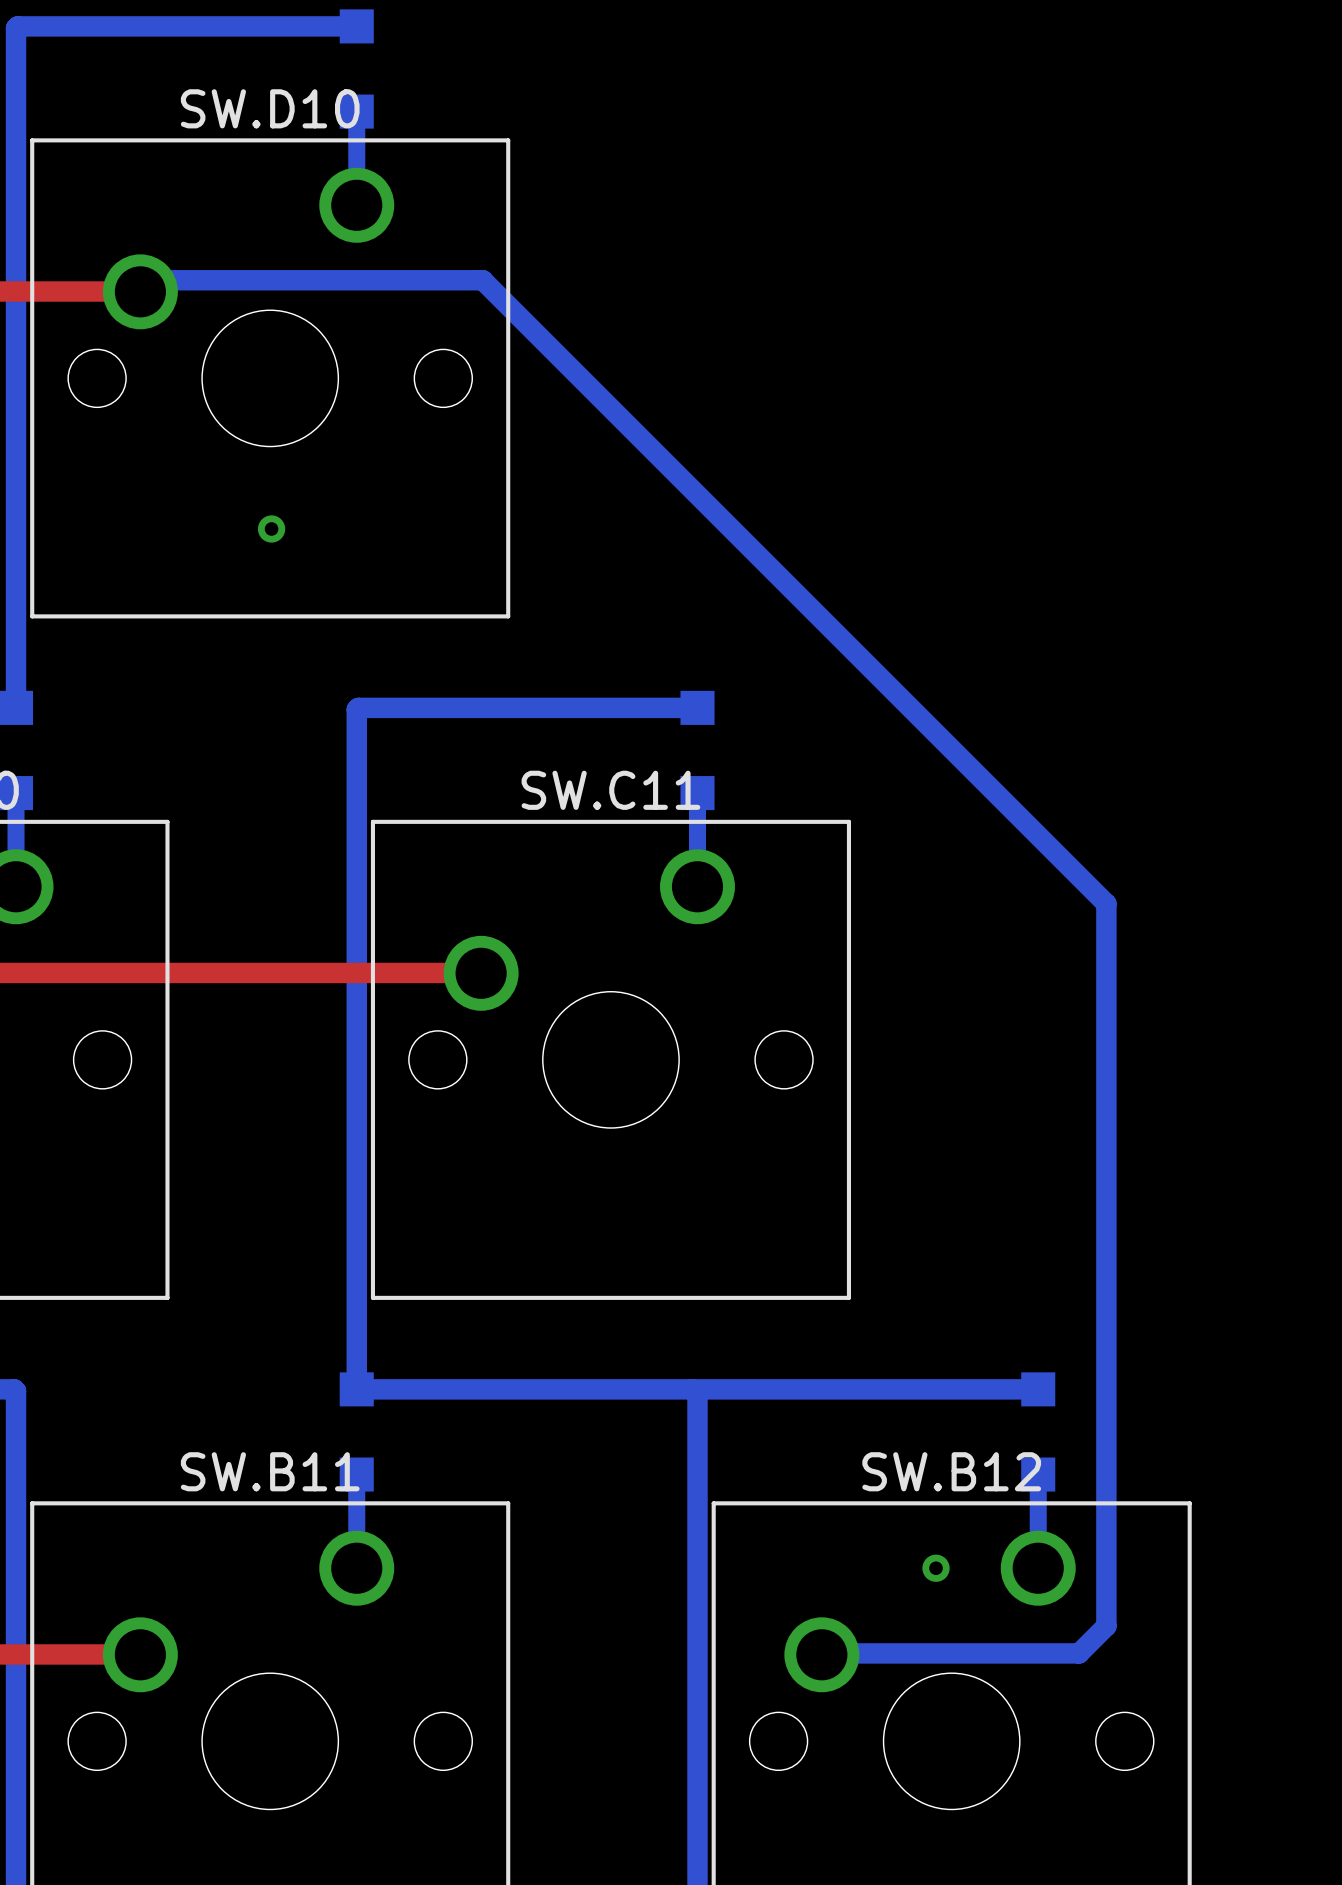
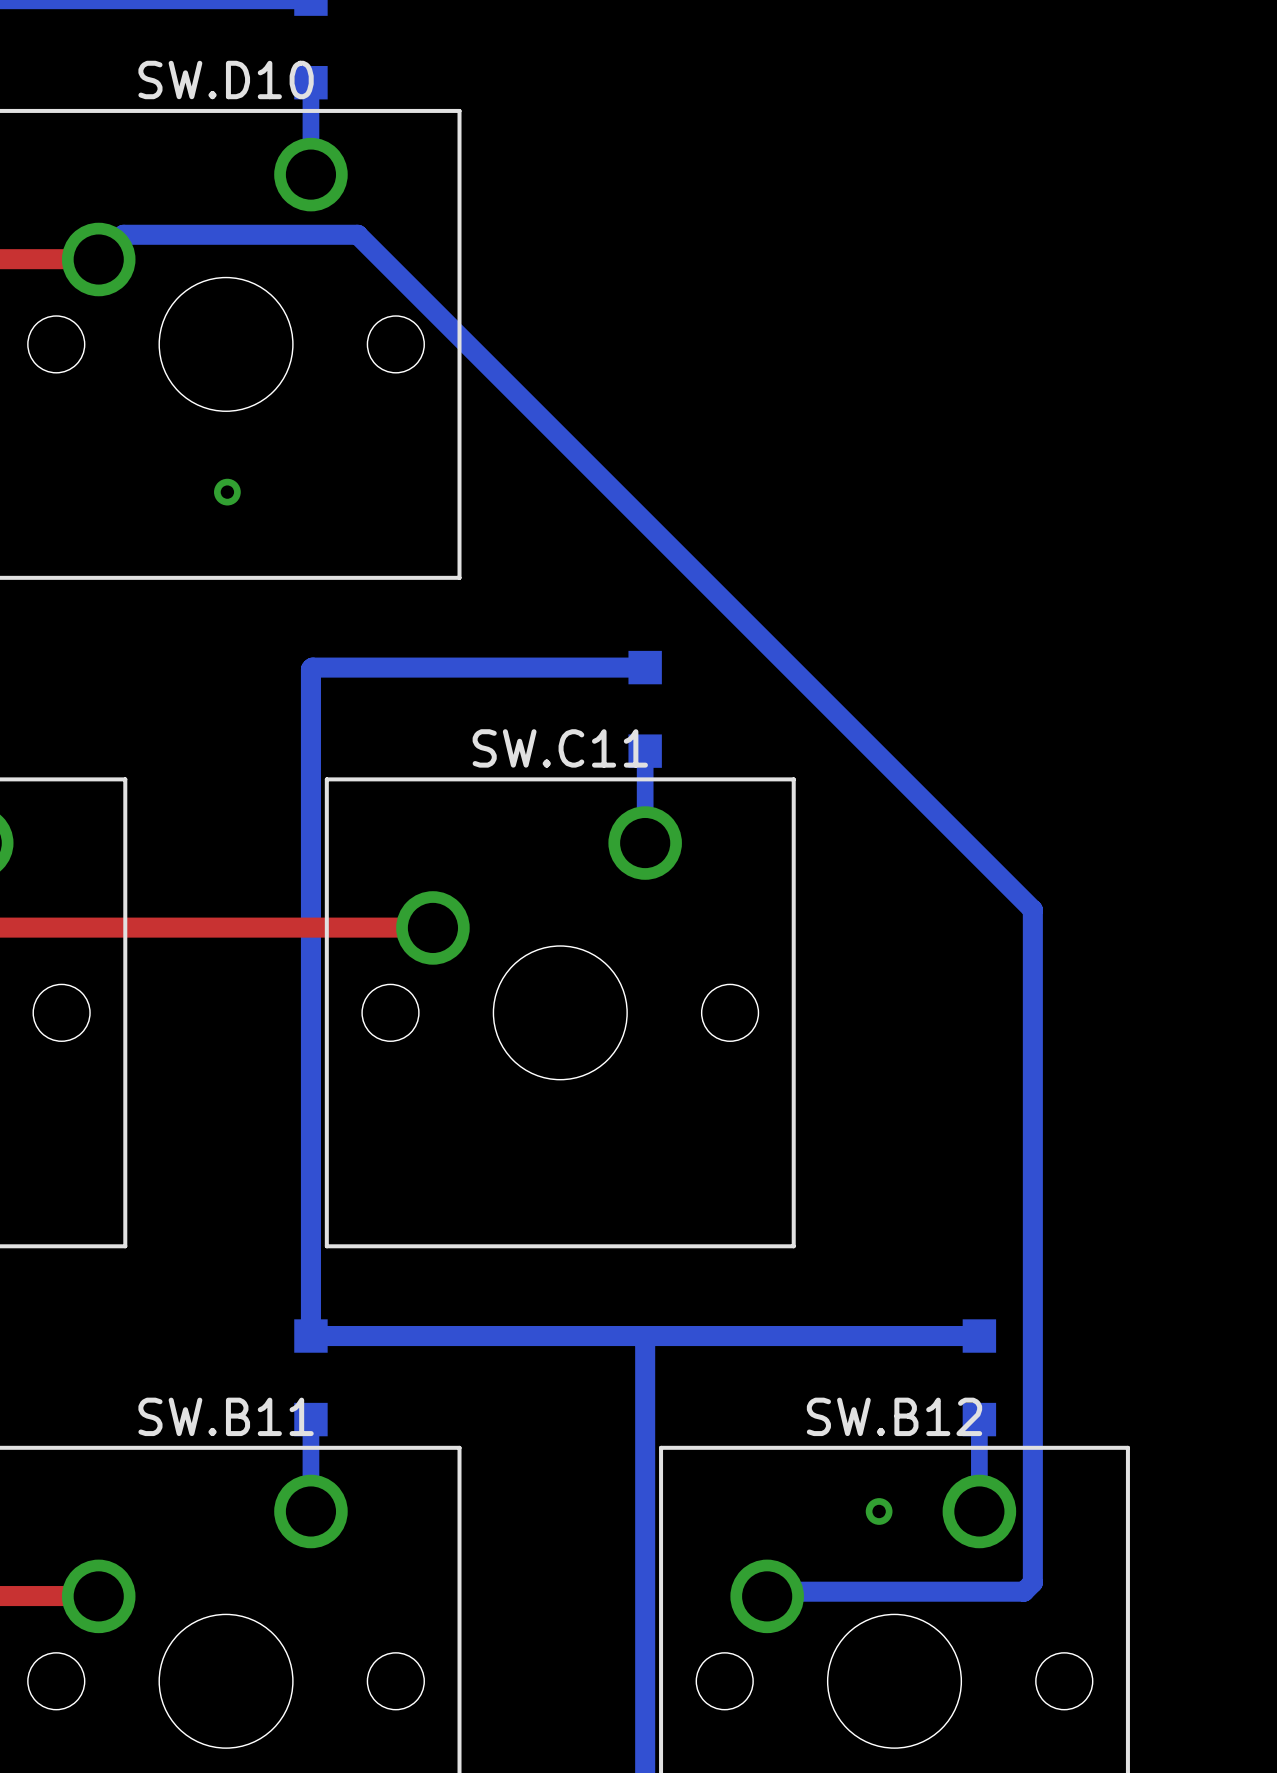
bottom track: (151, 280) (482, 280) (1106, 903) (1106, 1626) (1079, 1653) (823, 1653) -> (110, 248) (123, 234) (357, 234) (1032, 909) (1032, 1582) (1023, 1591) (771, 1591) (767, 1596)

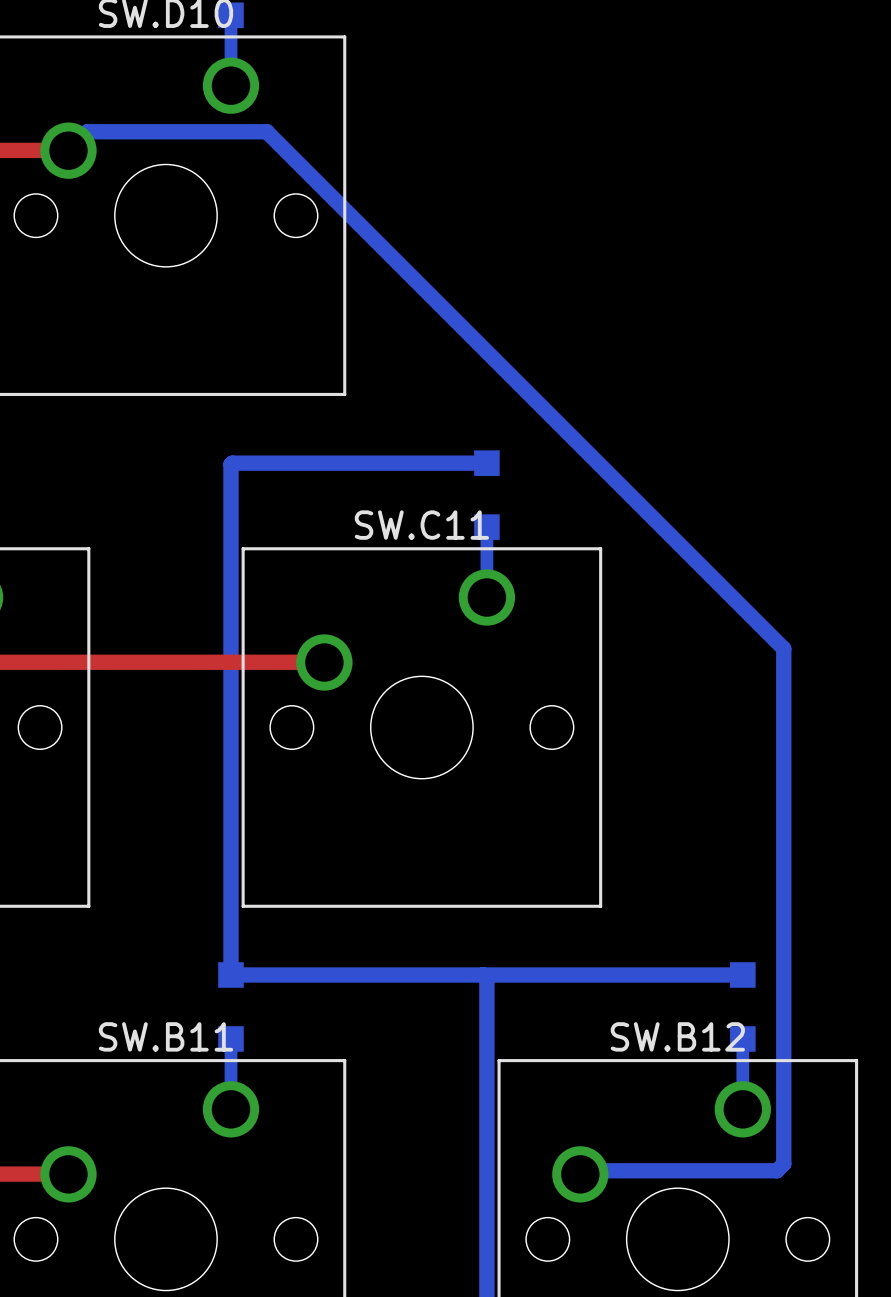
via: (227, 492) -> none
via: (879, 1511) -> none

